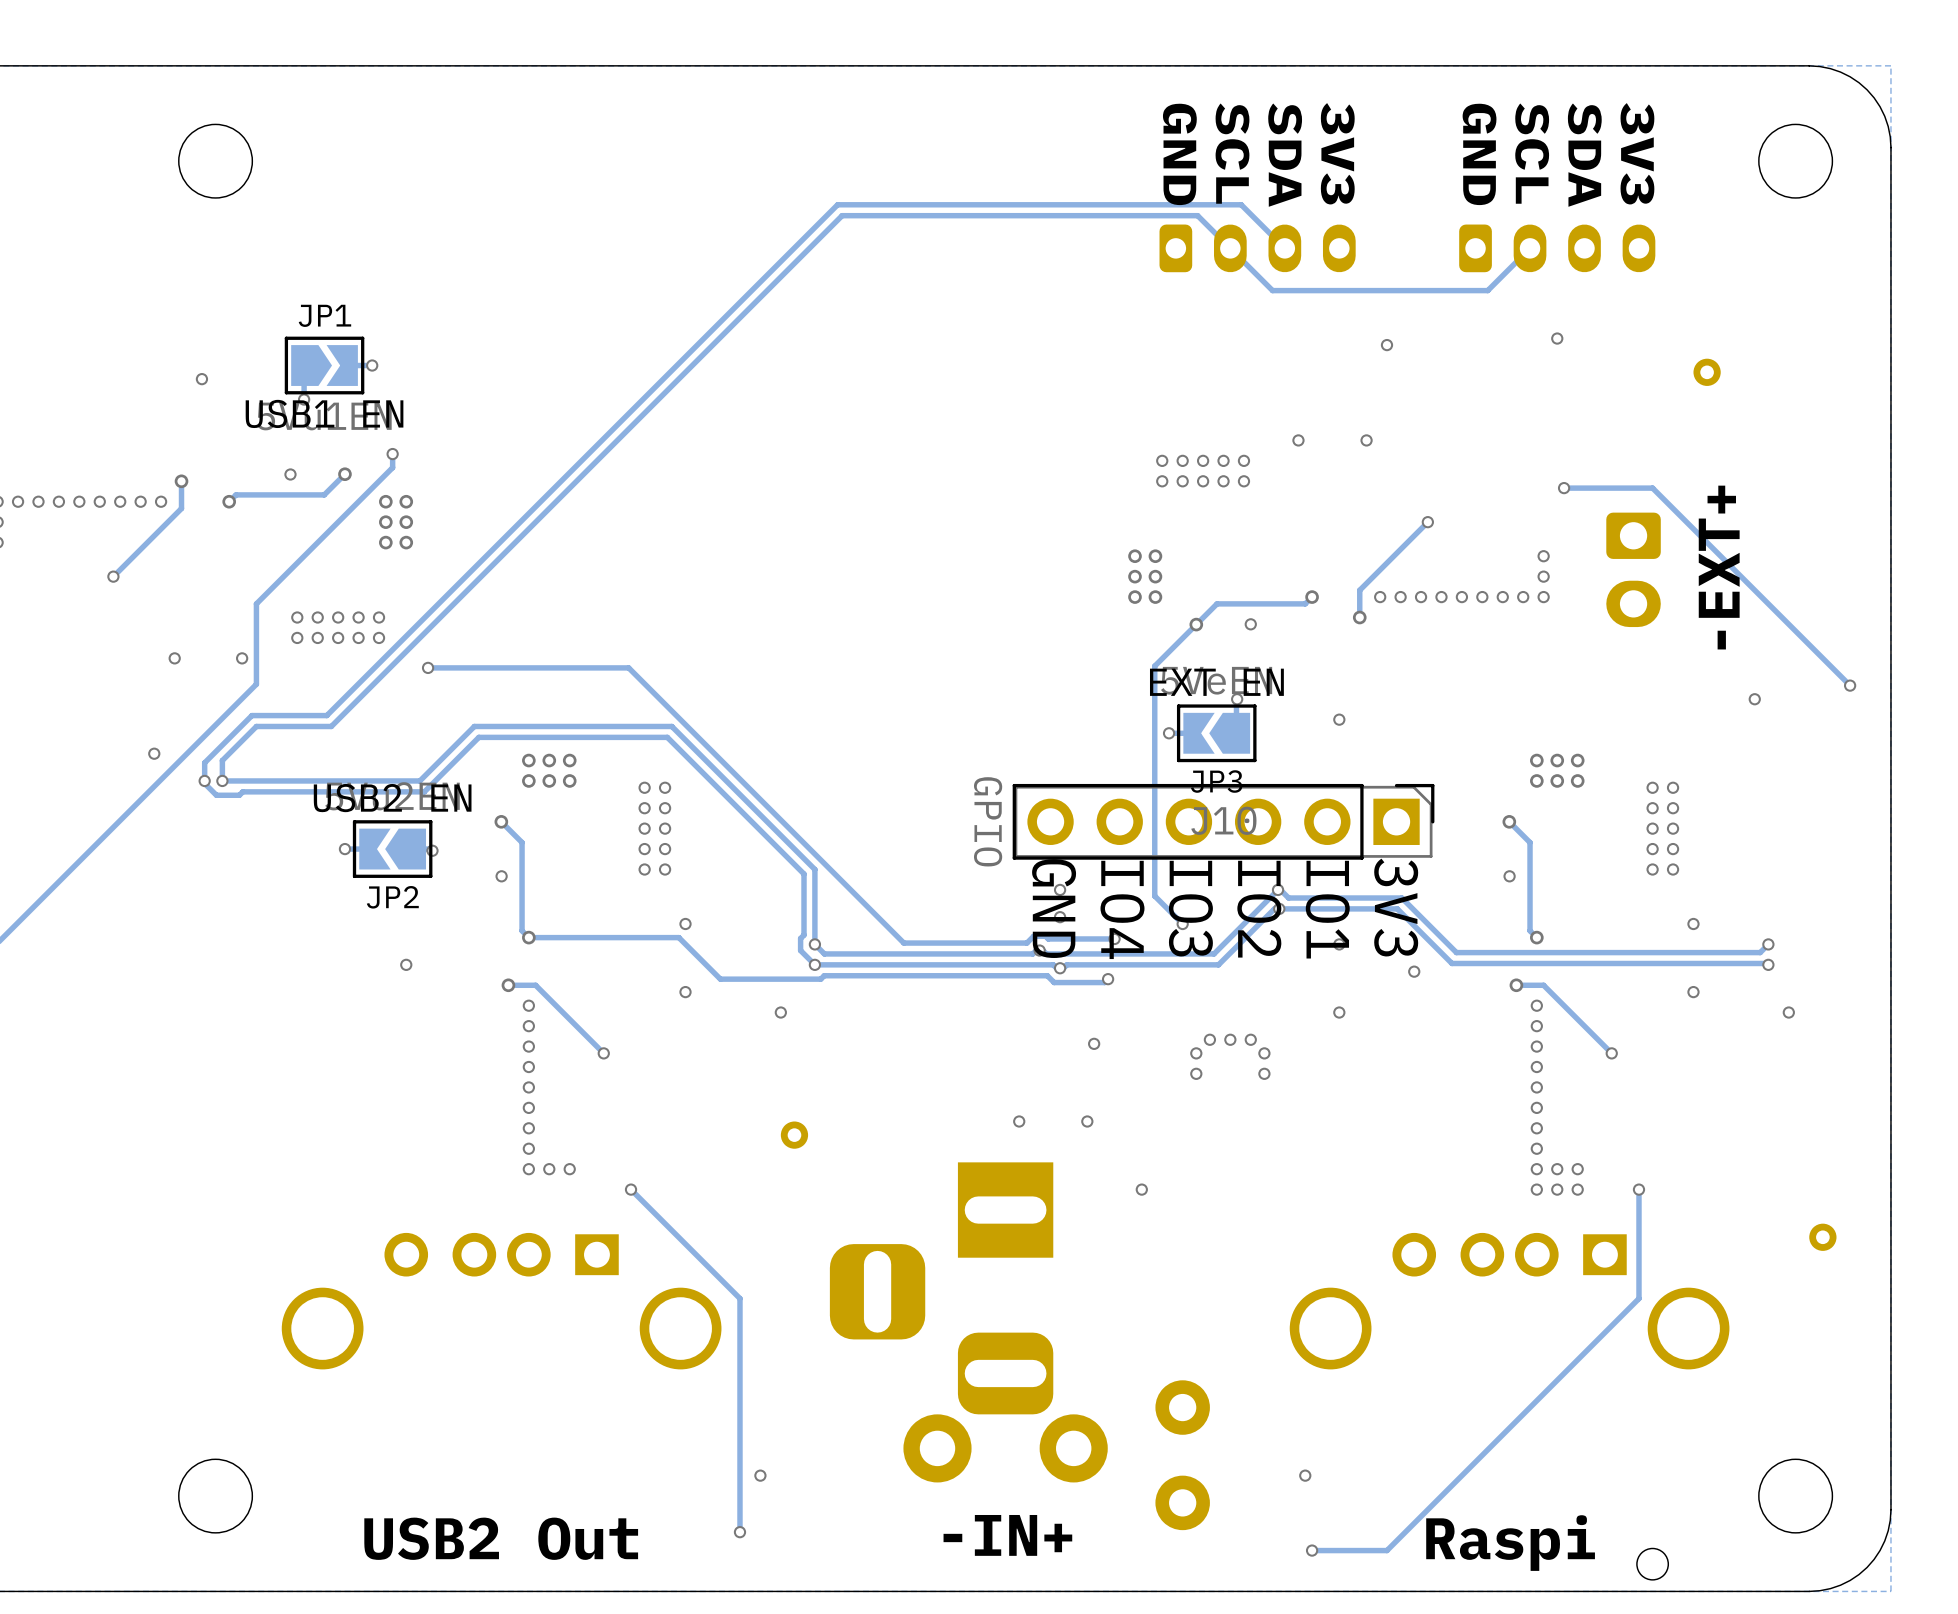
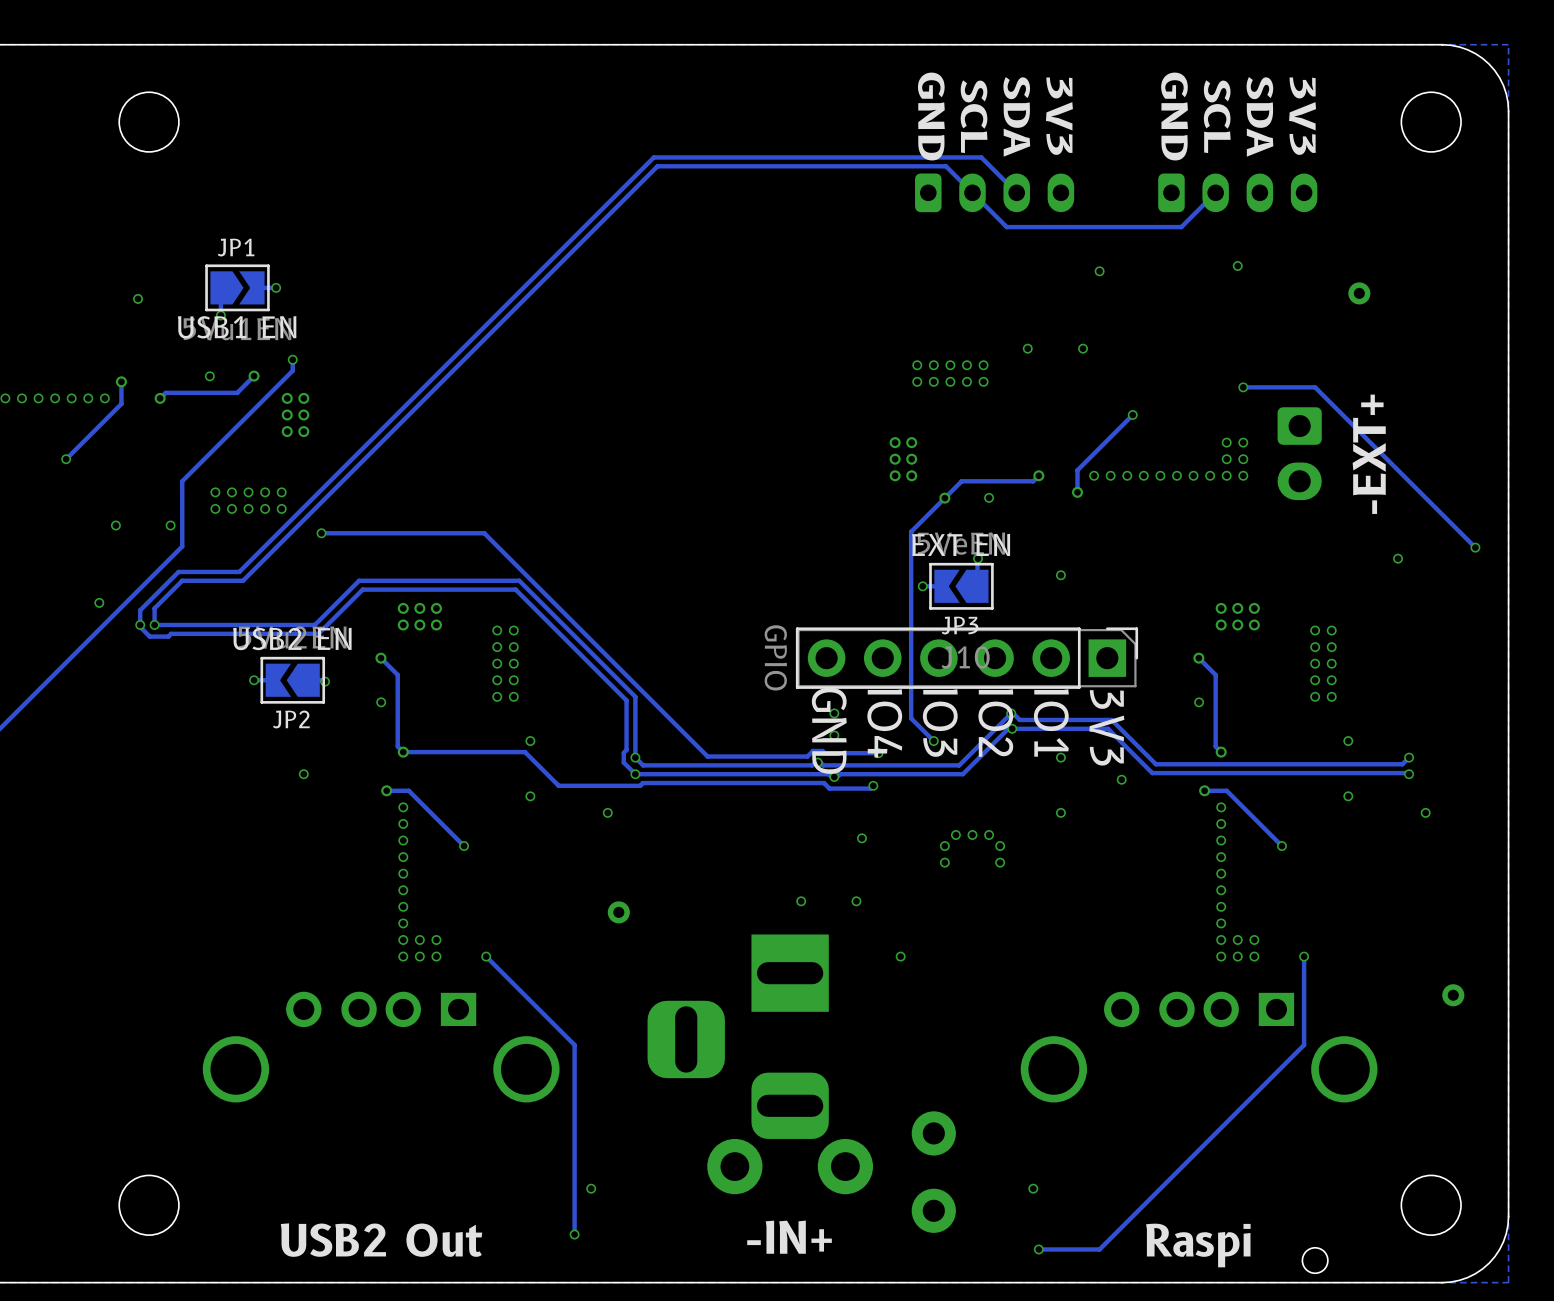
via: none -> (1243, 442)
via: none -> (1243, 459)
via: none -> (1243, 475)
via: none -> (403, 956)
via: none -> (419, 956)
via: none -> (436, 956)

